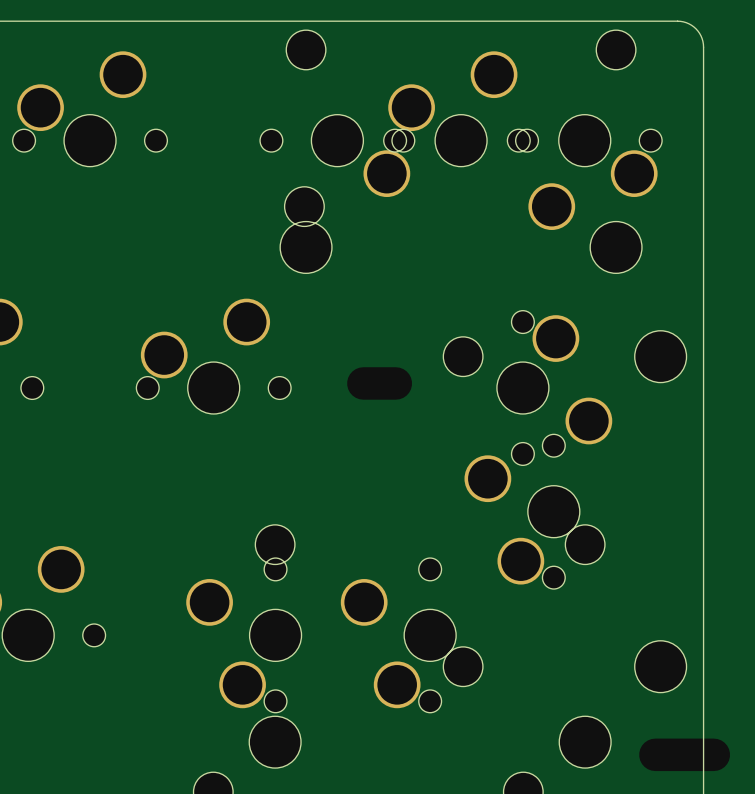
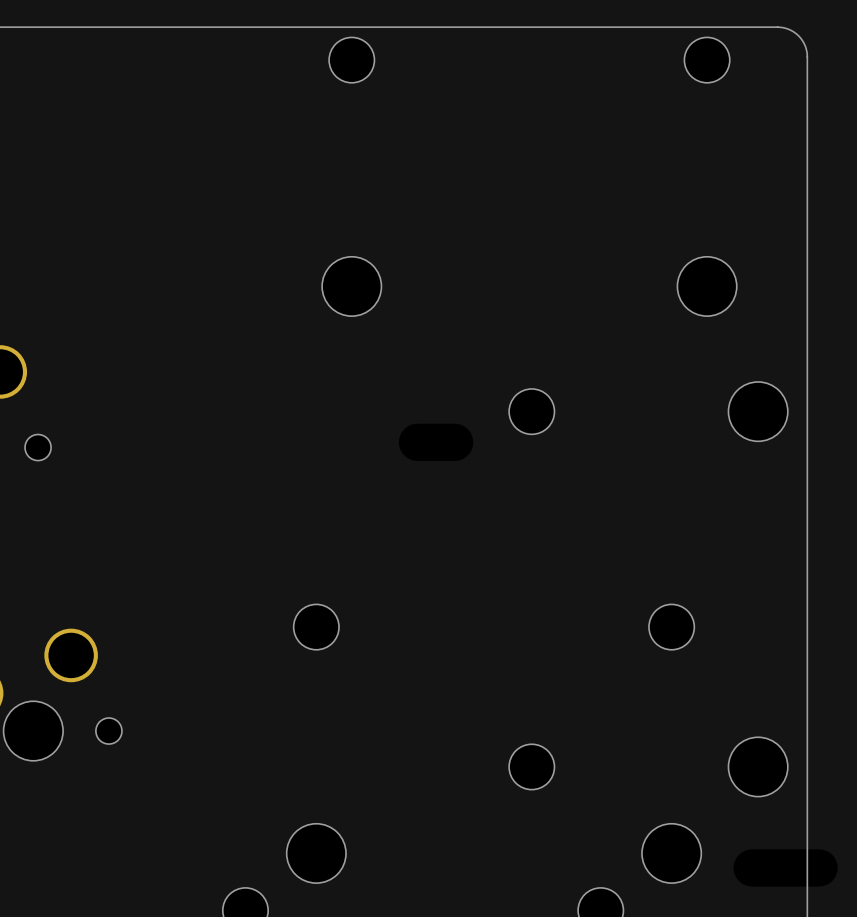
part: (90, 108) -> none
part: (461, 108) -> none
part: (337, 170) -> none
part: (584, 172) -> none
part: (213, 356) -> none
part: (554, 388) -> none
part: (522, 511) -> none
part: (243, 635) -> none
part: (398, 635) -> none

